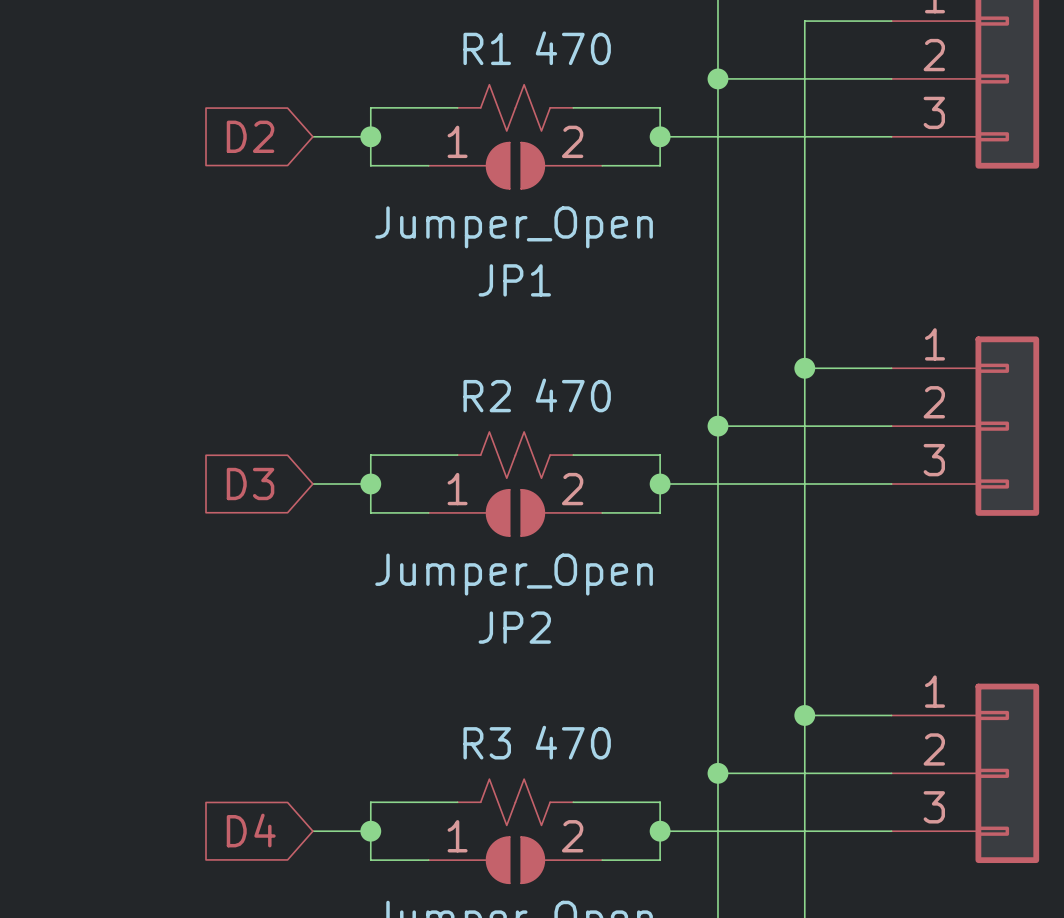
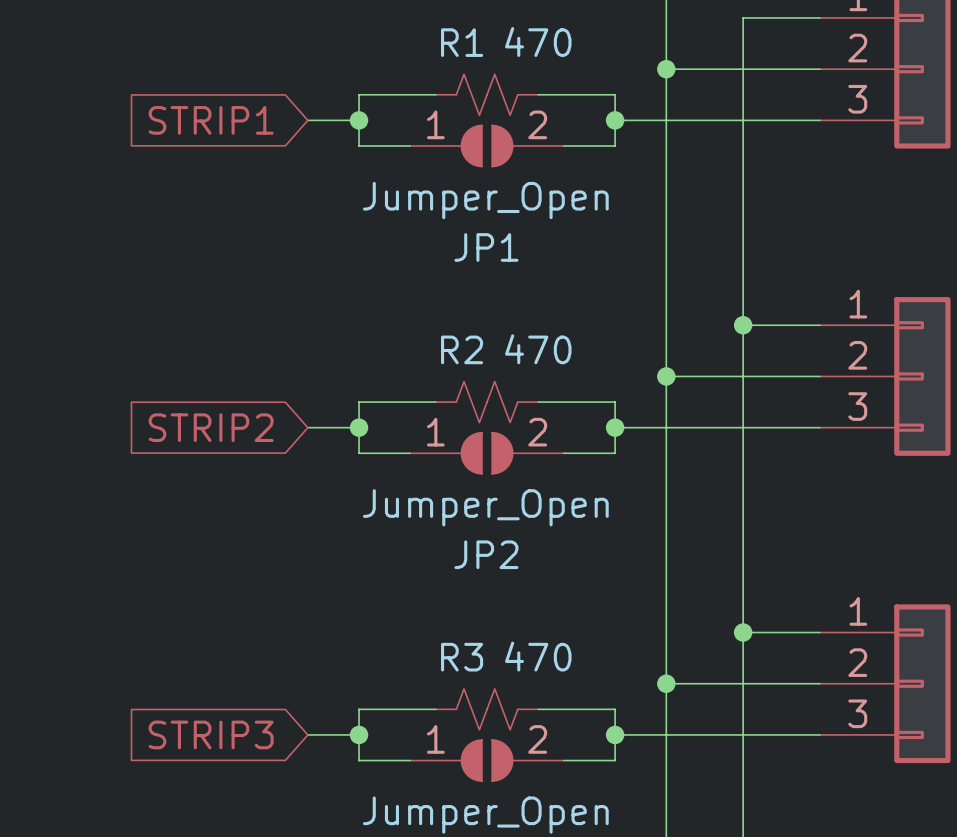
global label: D2 (250, 136) -> STRIP1 (211, 120)
global label: D3 (250, 484) -> STRIP2 (211, 427)
global label: D4 (251, 830) -> STRIP3 (211, 734)

